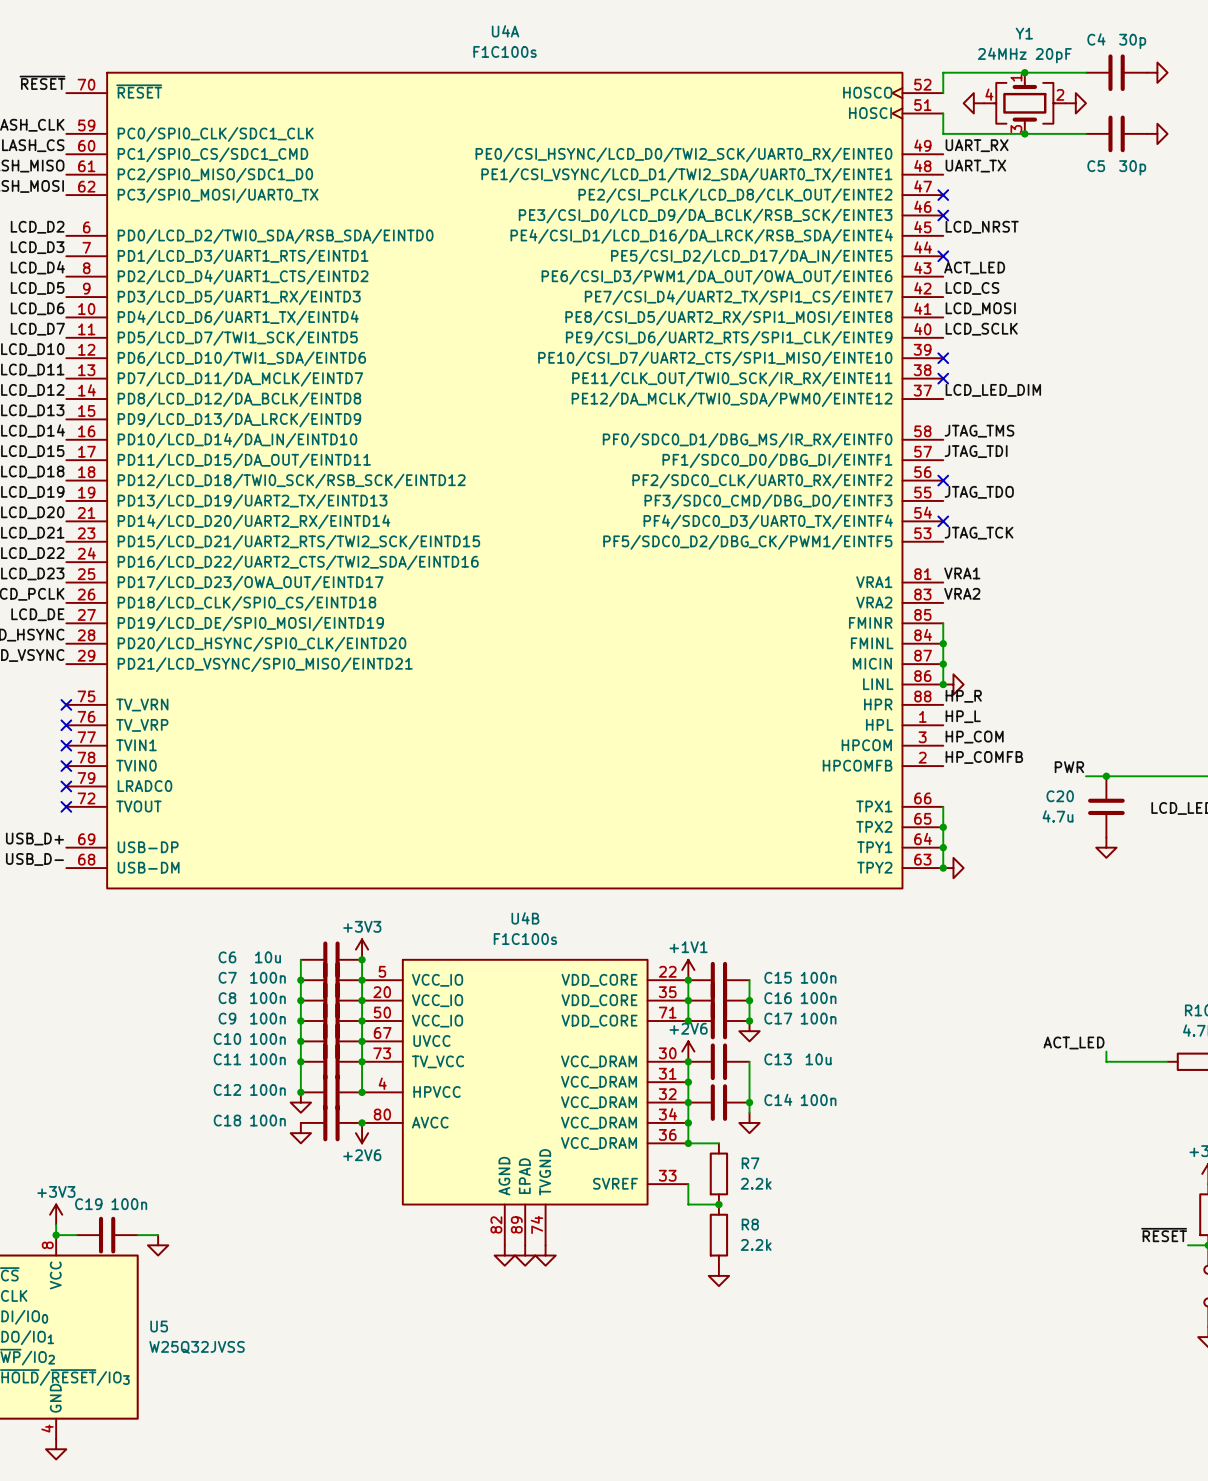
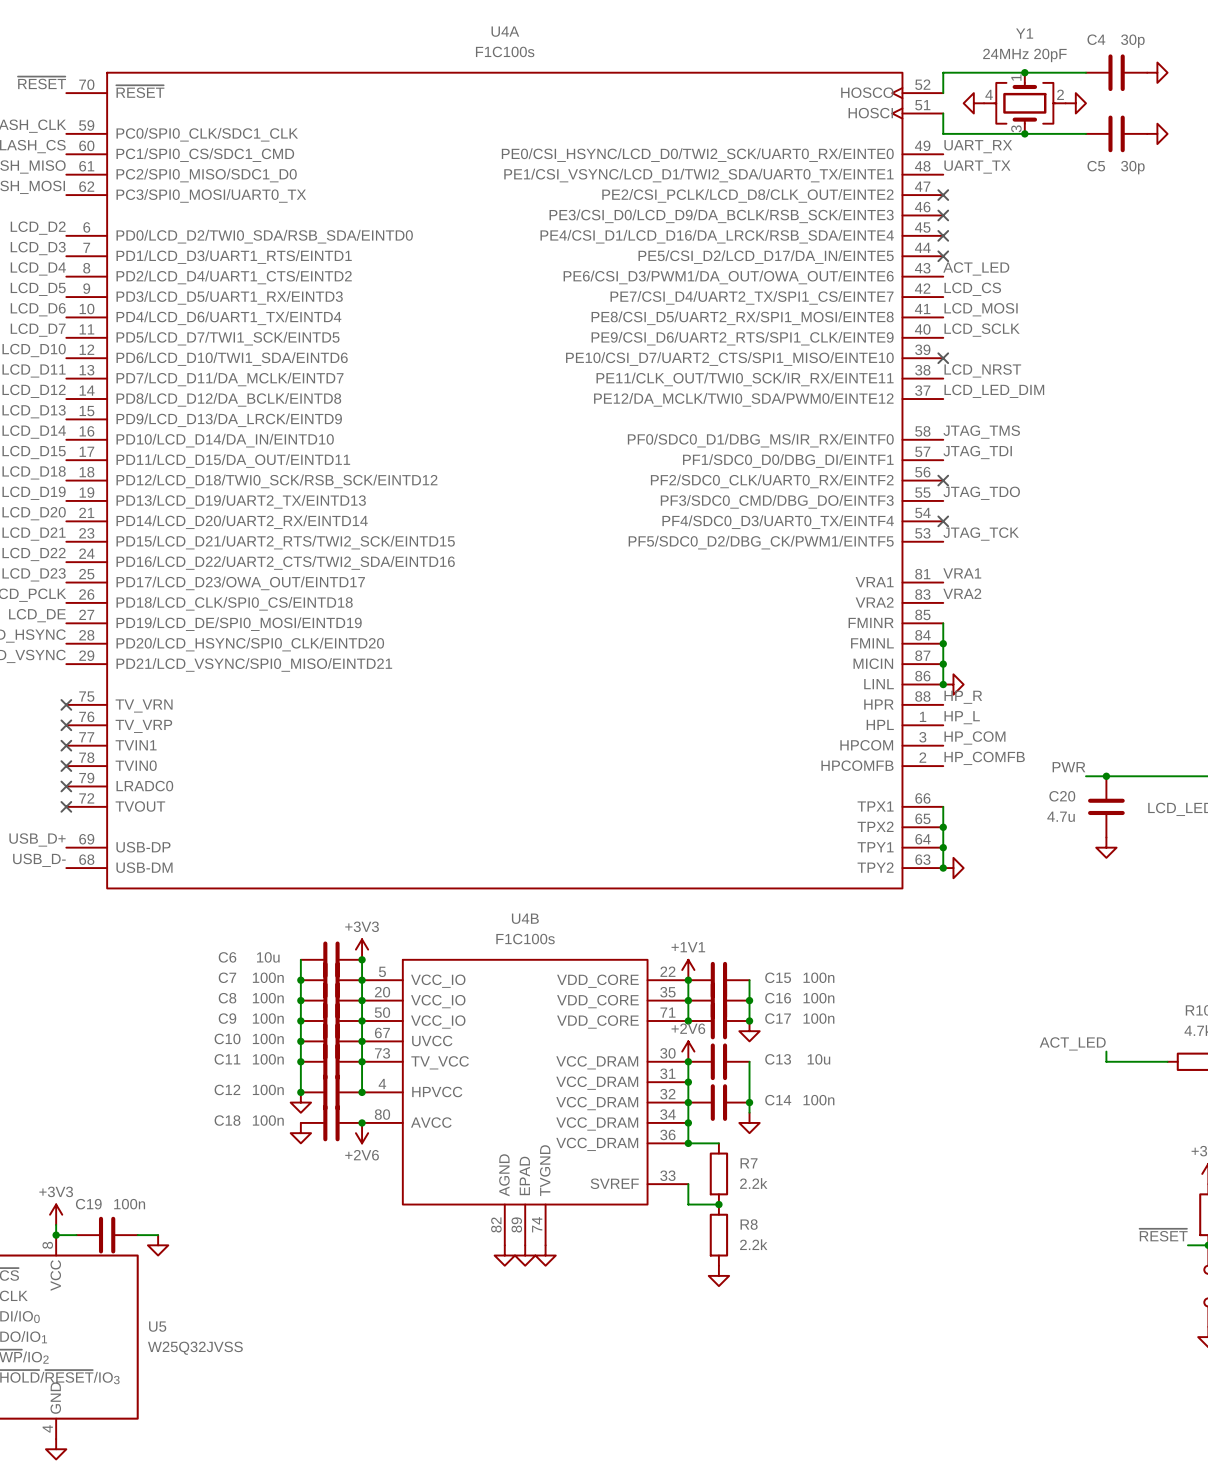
label position: LCD_NRST (982, 227) -> LCD_NRST (982, 370)
no-connect mark: none -> (943, 235)
no-connect mark: (943, 378) -> none

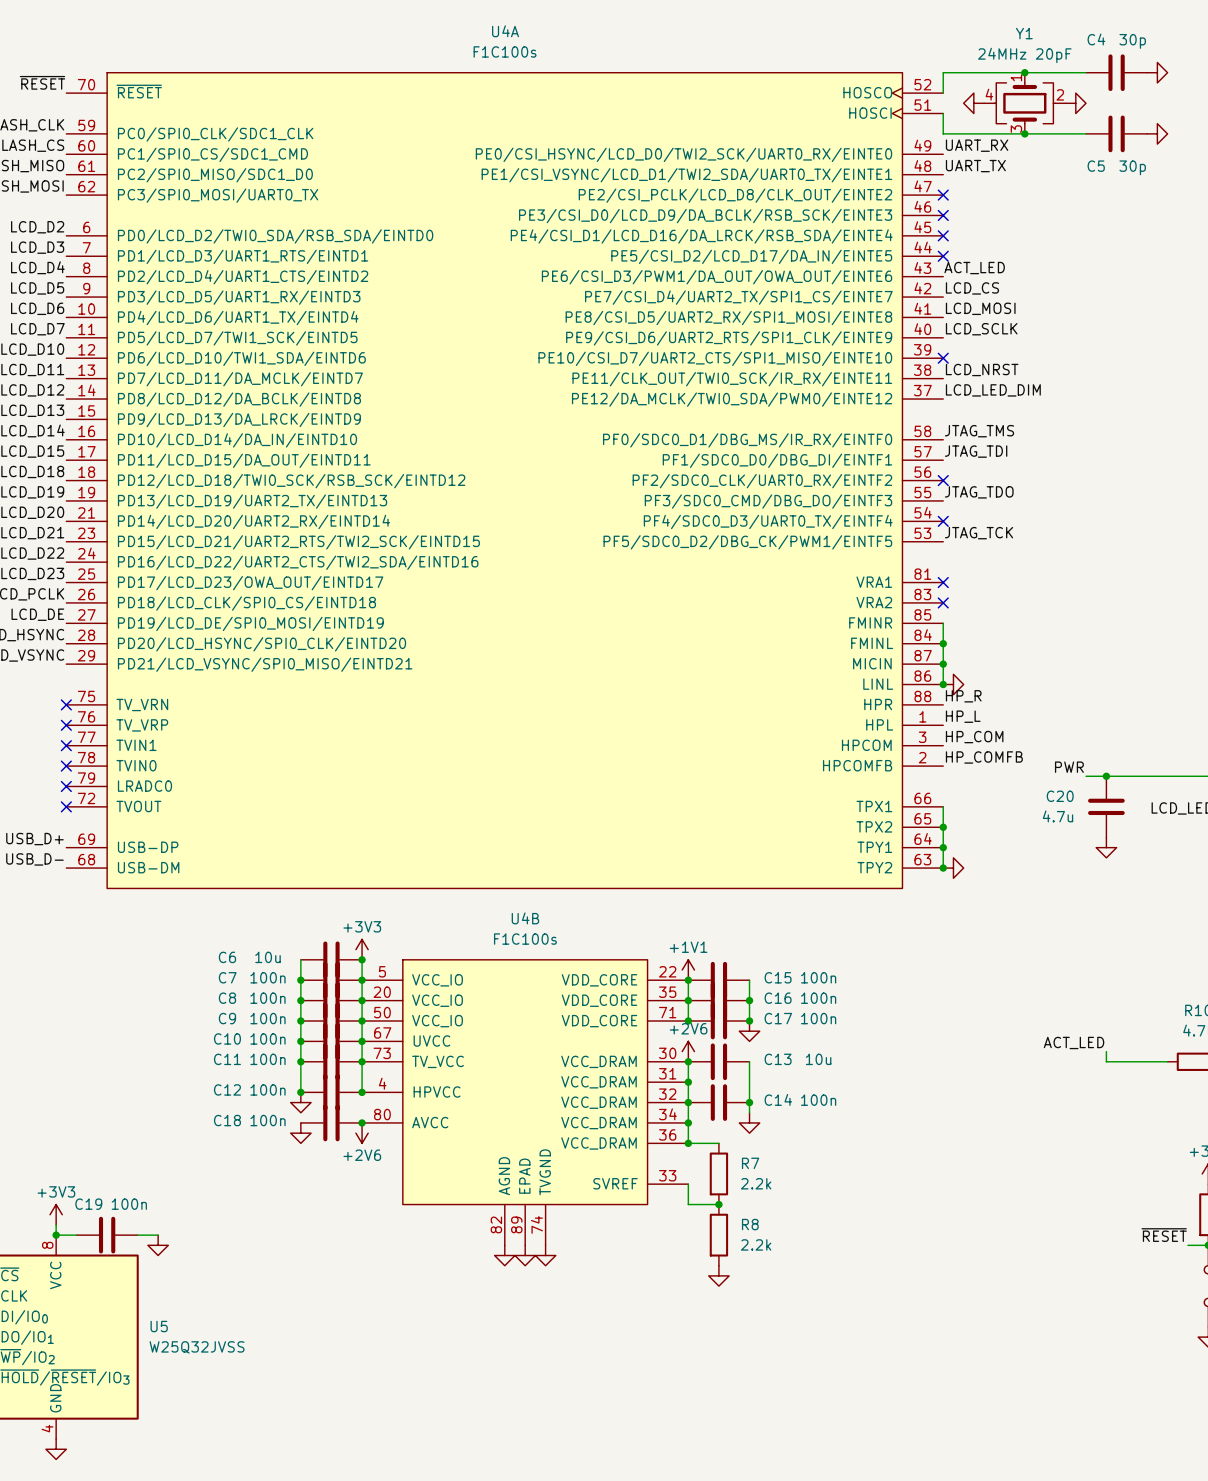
label: VRA1 (962, 573) -> none
no-connect mark: none -> (943, 582)
label: VRA2 (962, 593) -> none
no-connect mark: none -> (943, 602)

